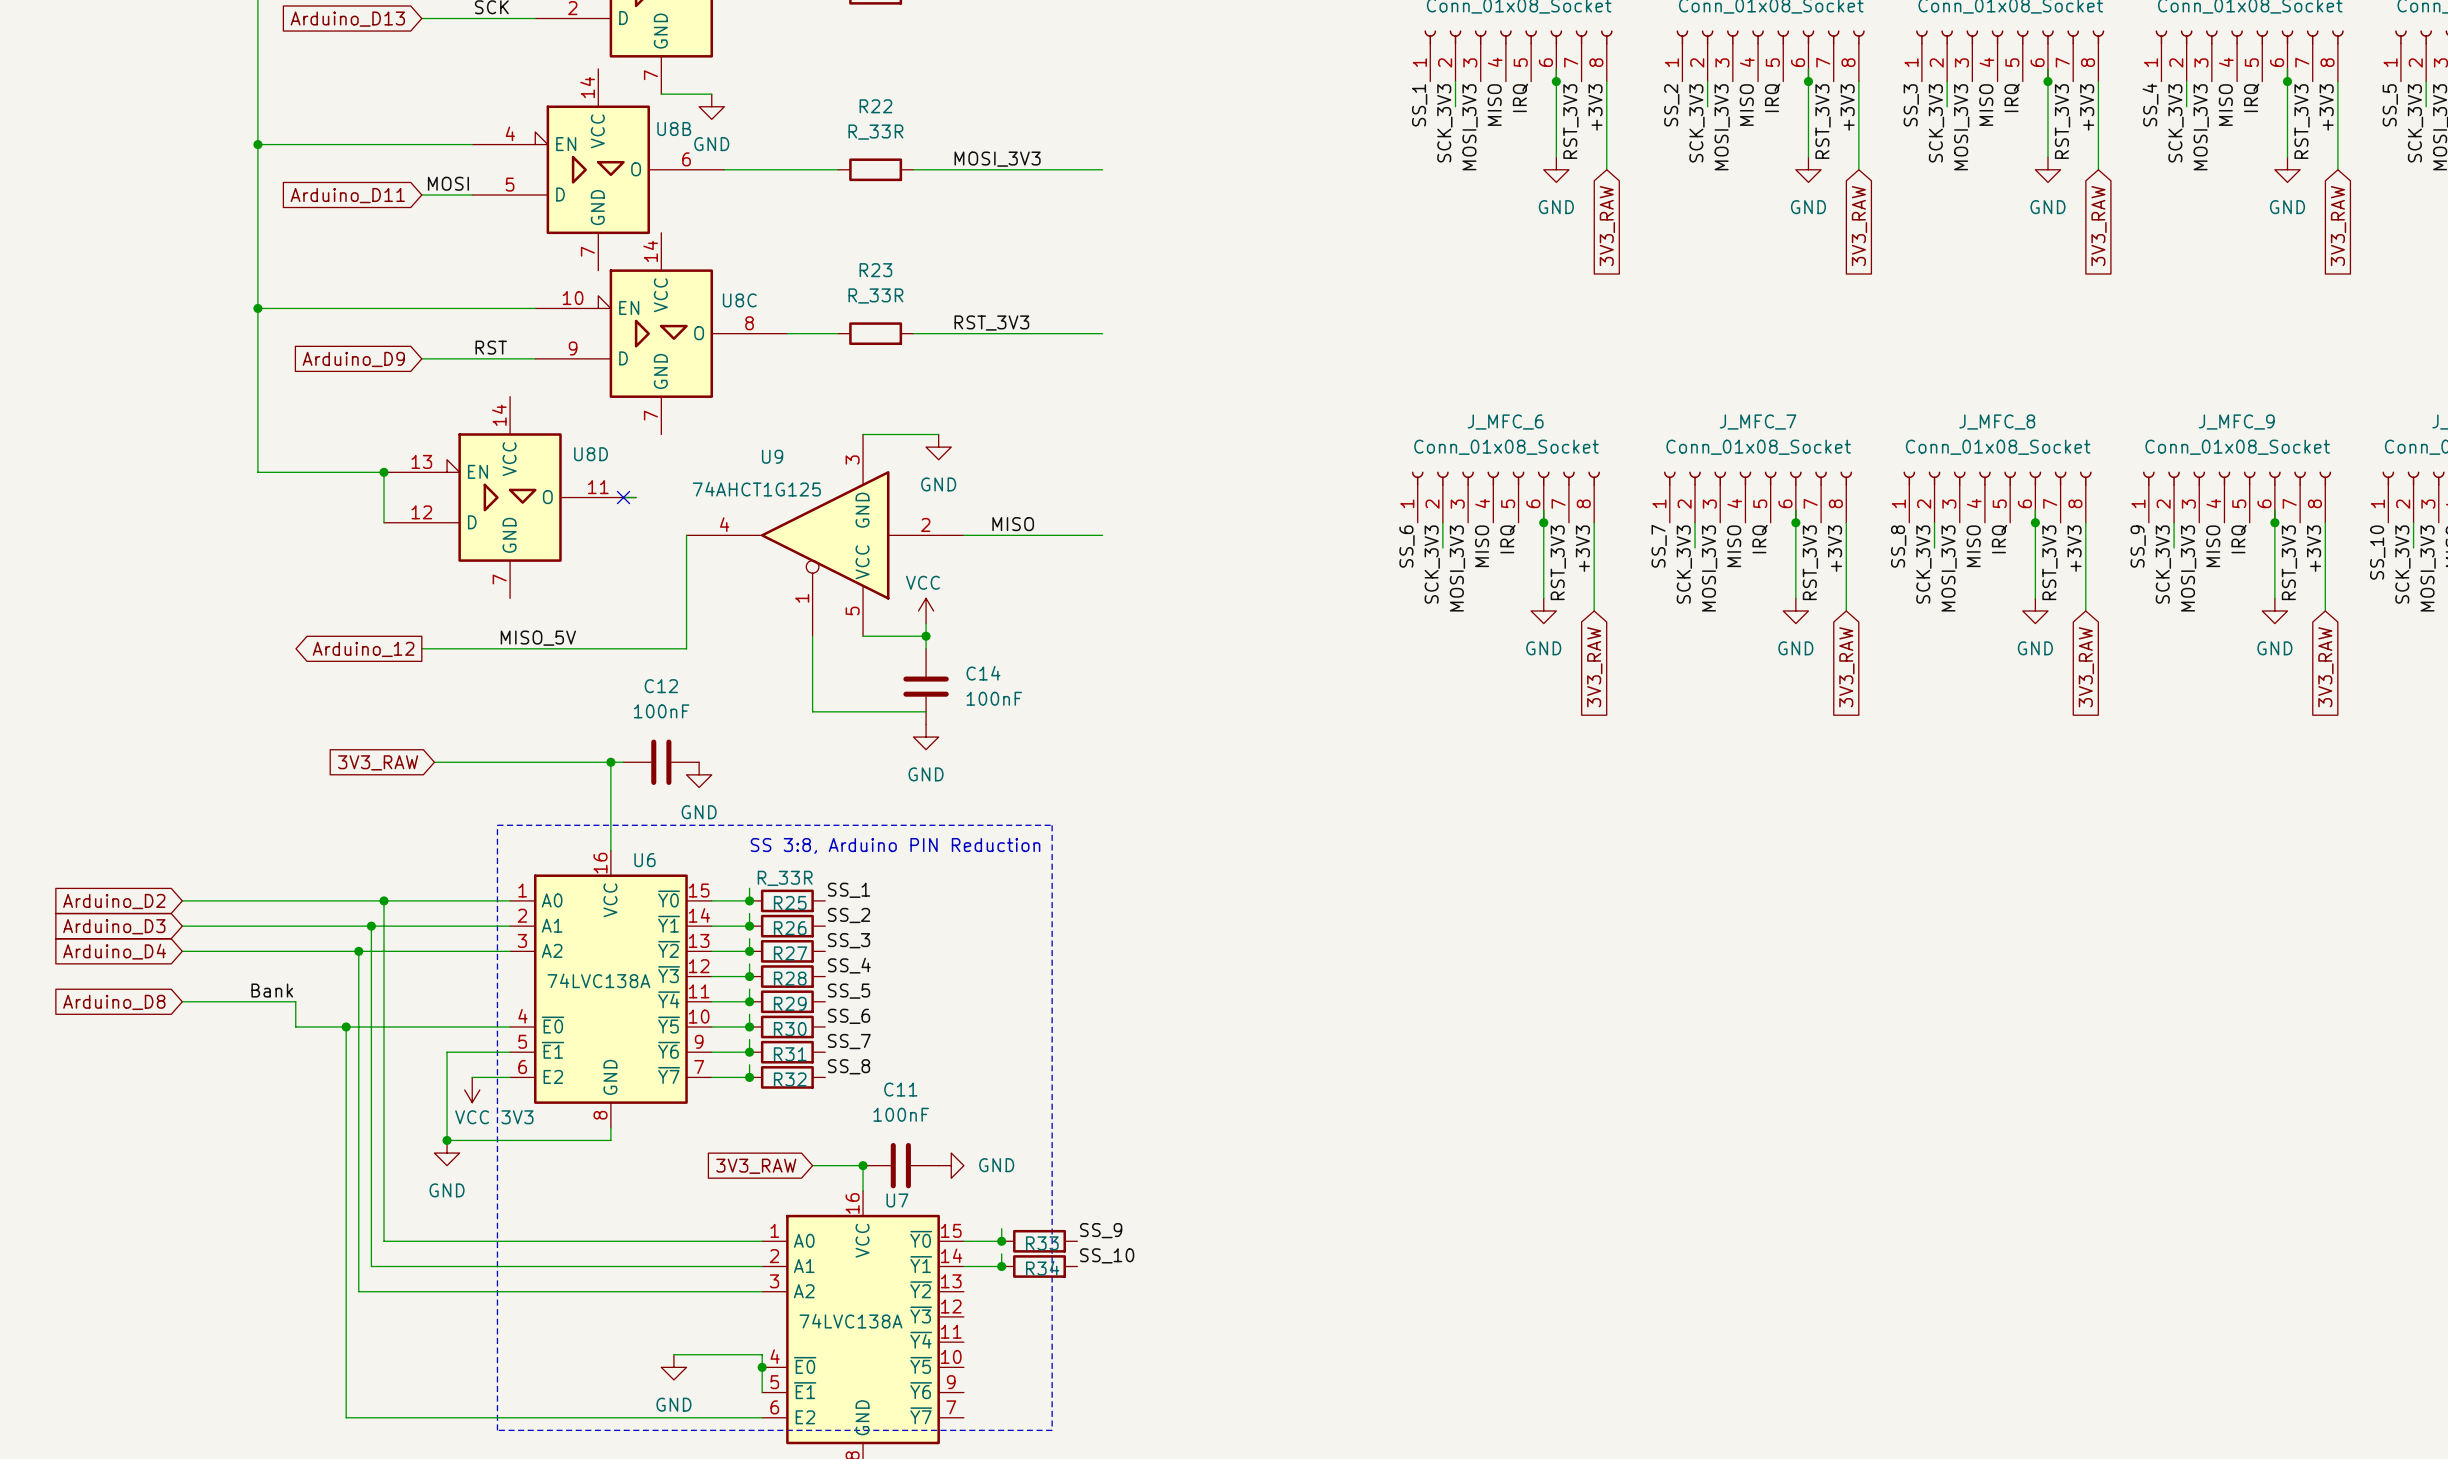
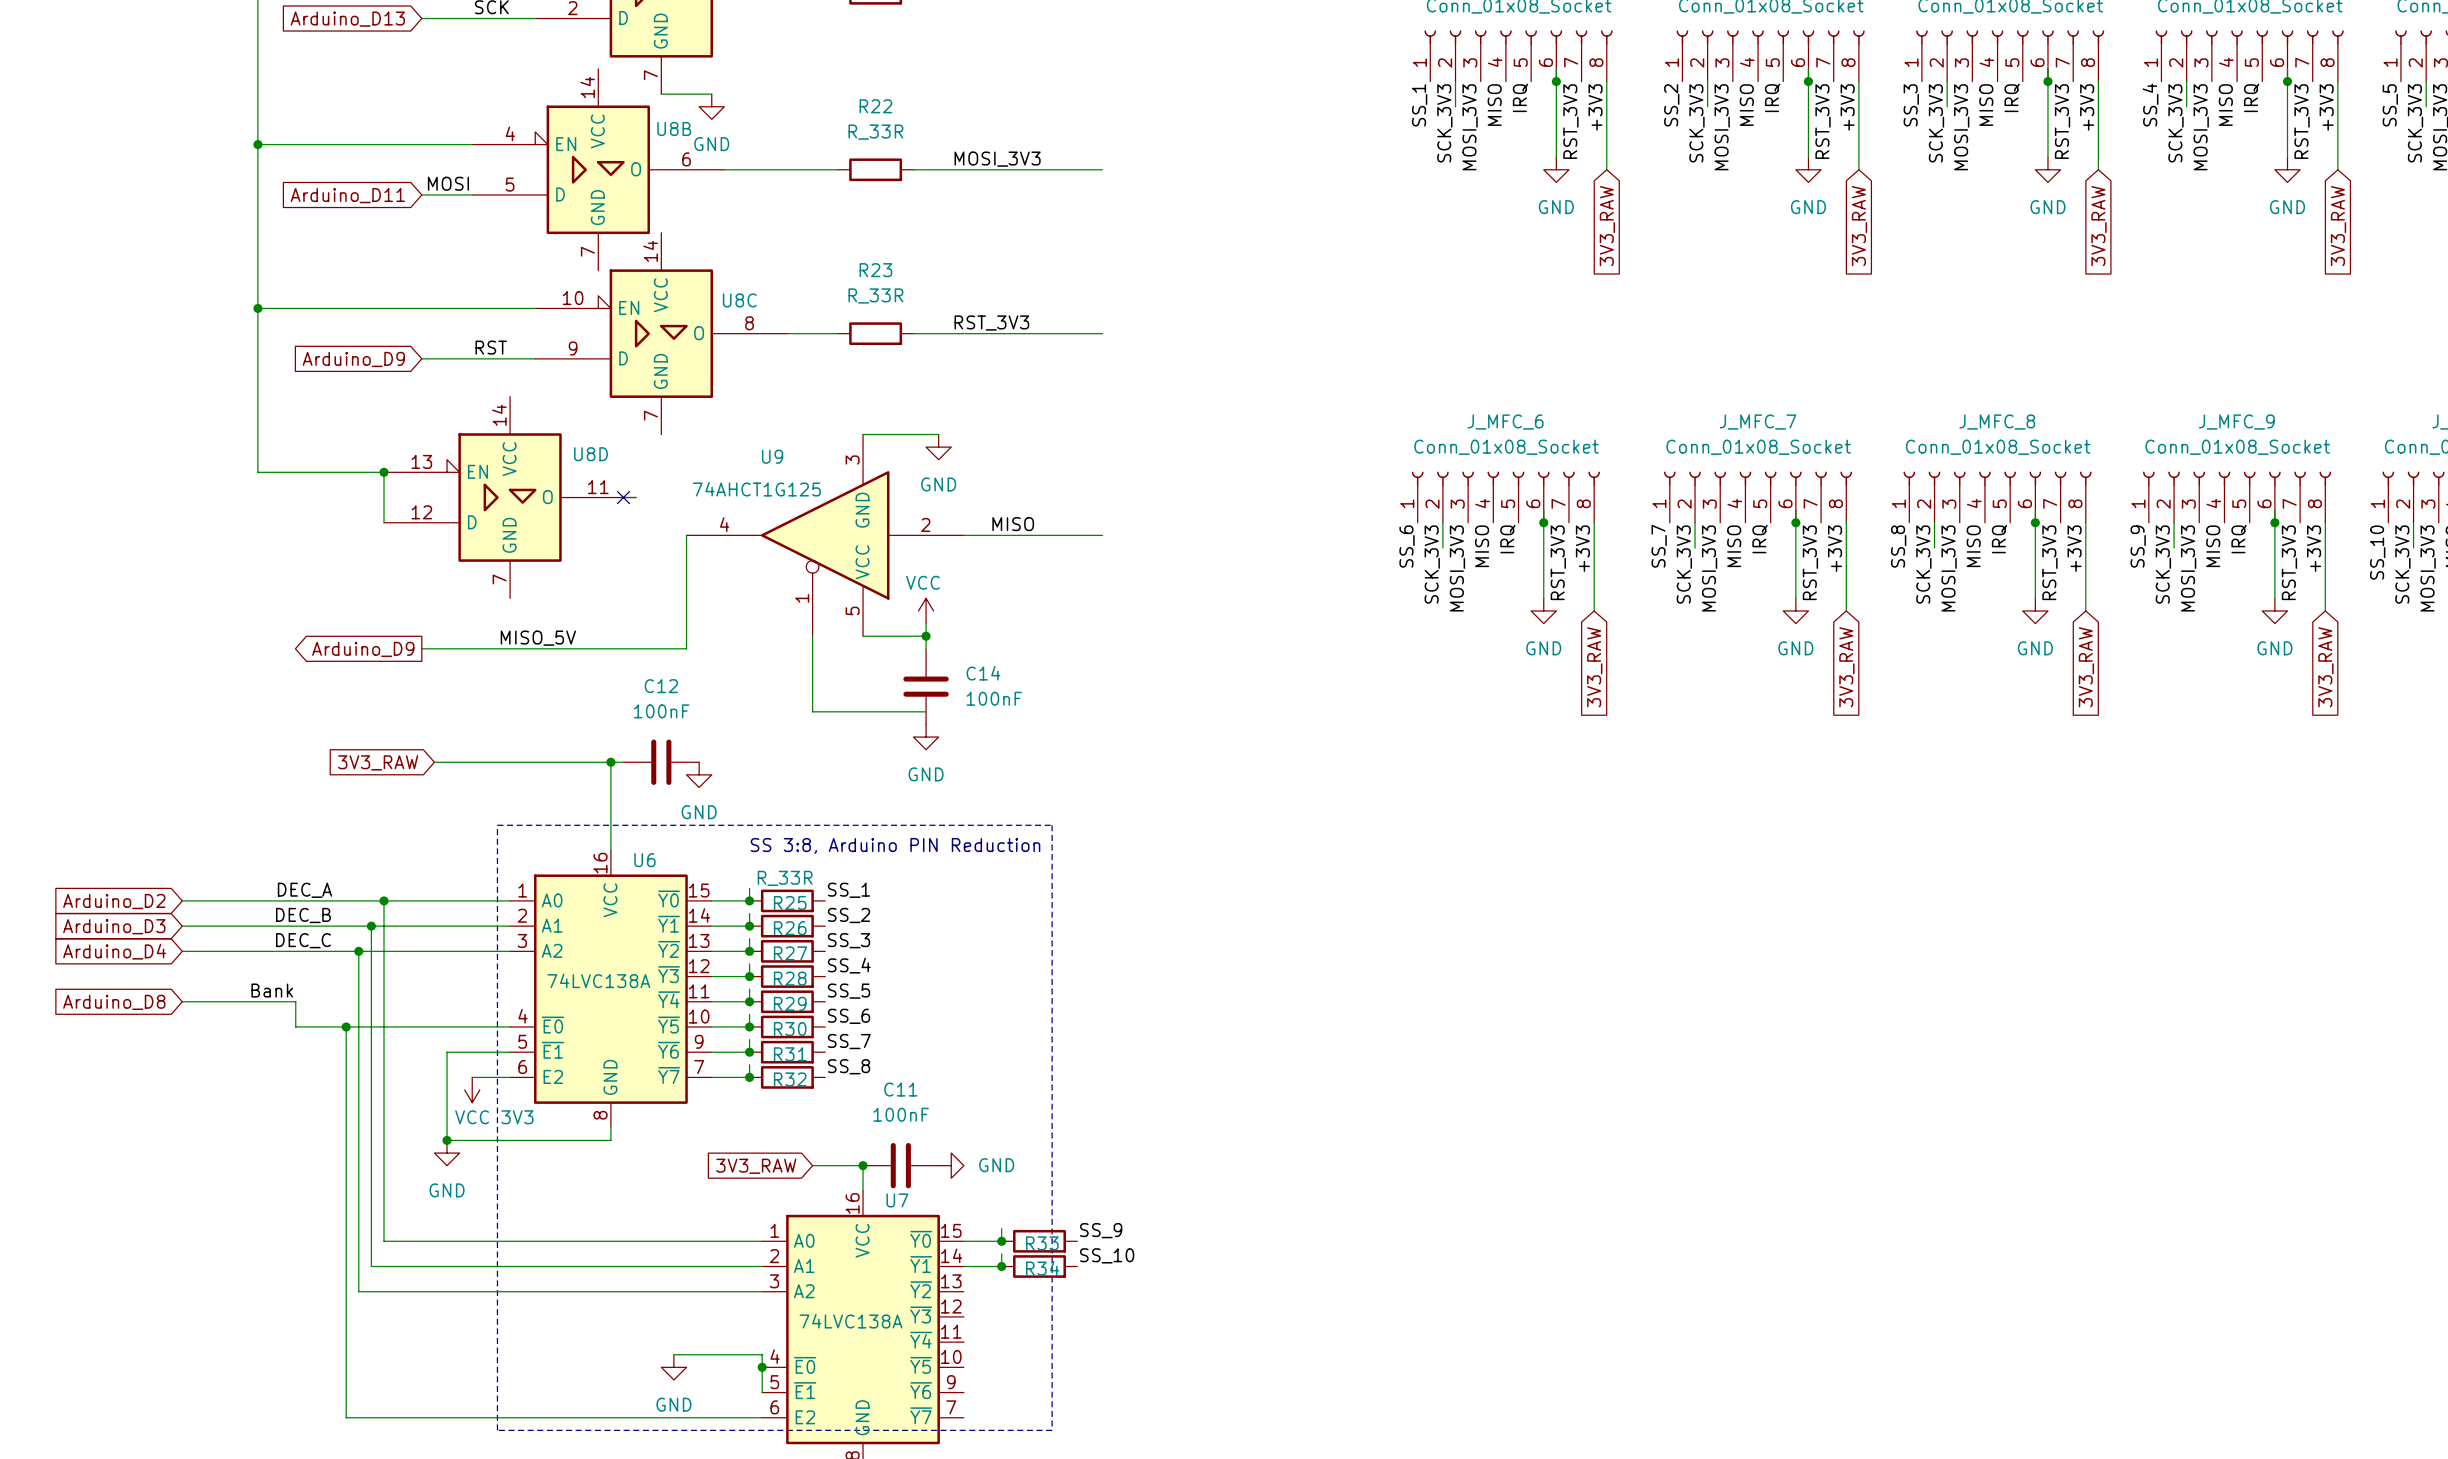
global label: Arduino_12 (363, 649) -> Arduino_D9 (363, 649)
label: none -> DEC_A (304, 890)
label: none -> DEC_B (303, 915)
label: none -> DEC_C (303, 940)

